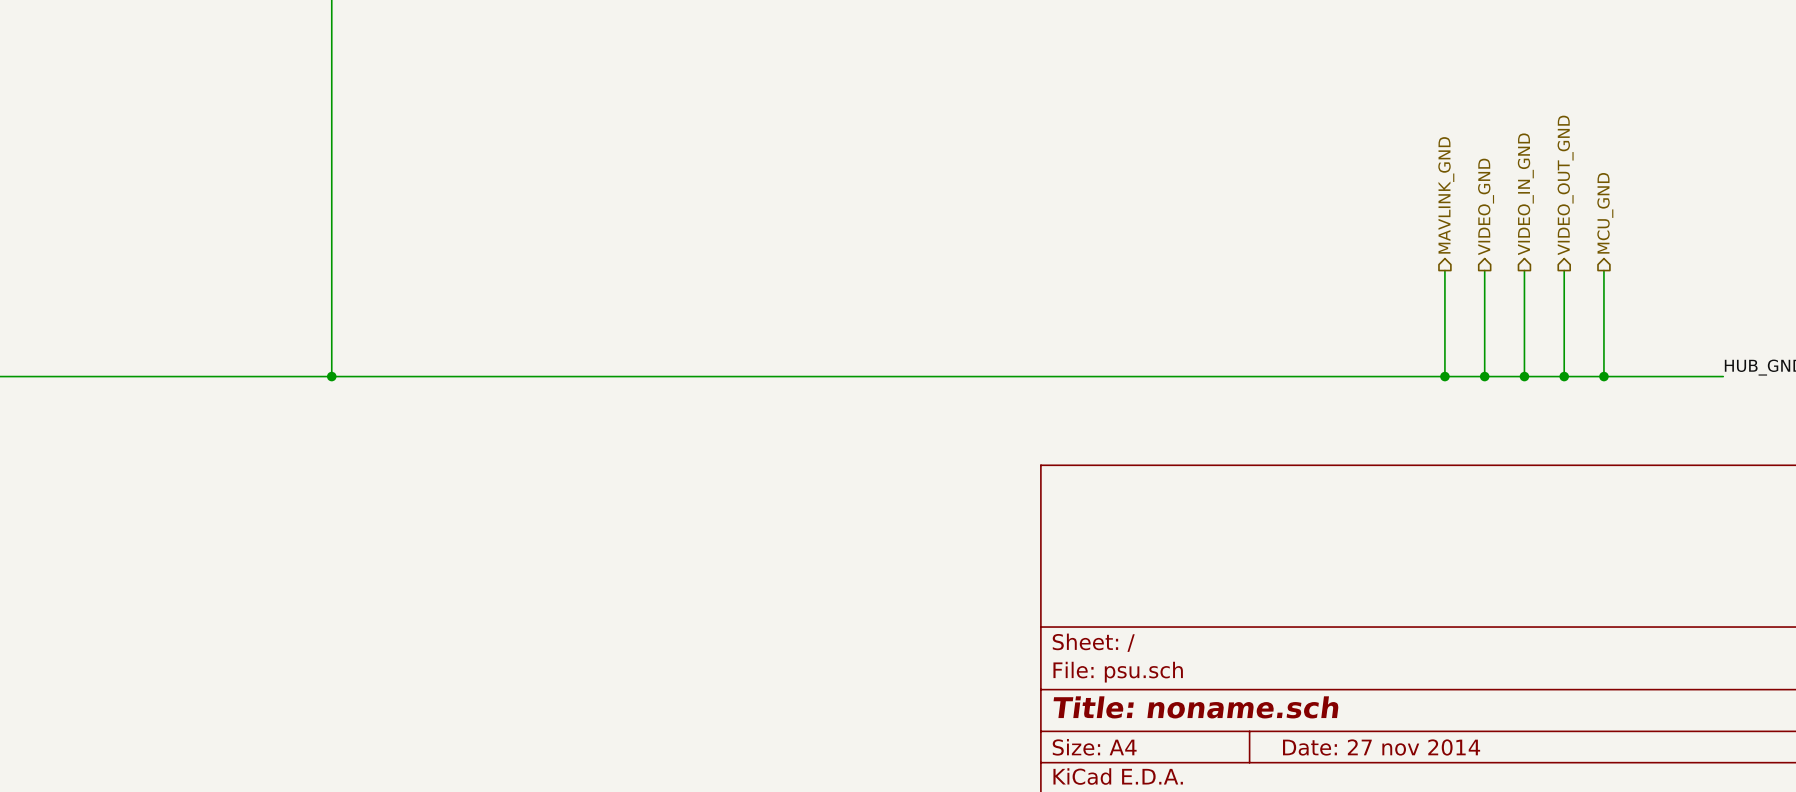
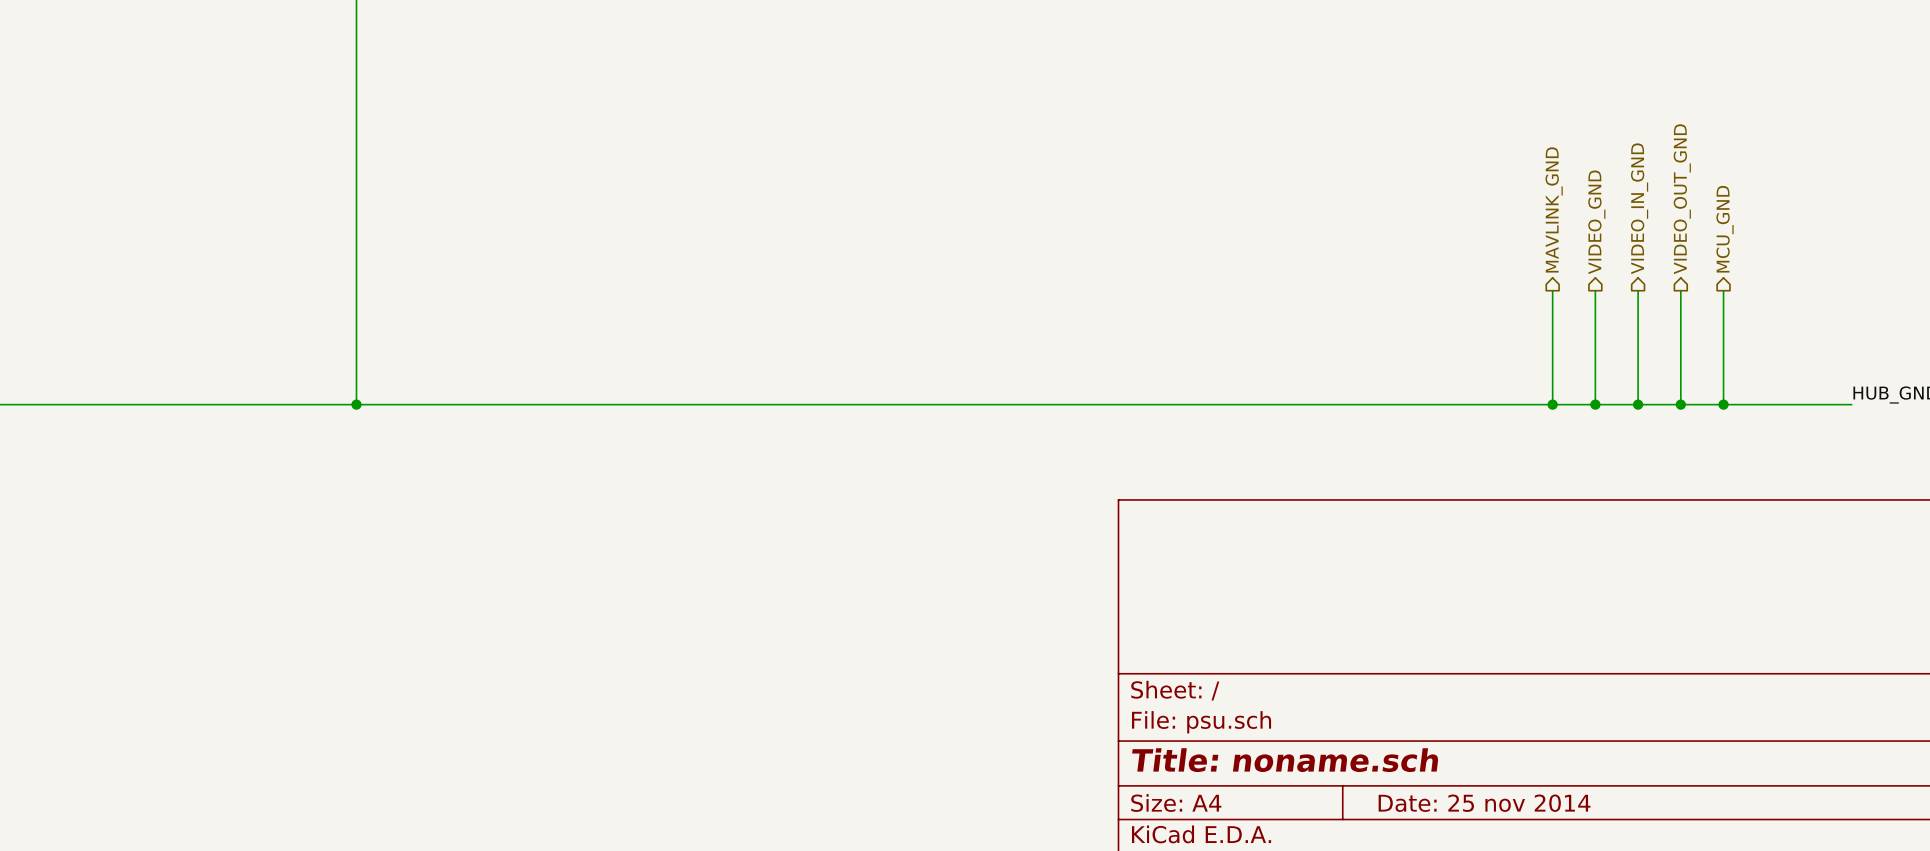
title block: Date: 27 nov 2014 (1381, 747) -> Date: 25 nov 2014 (1484, 803)

